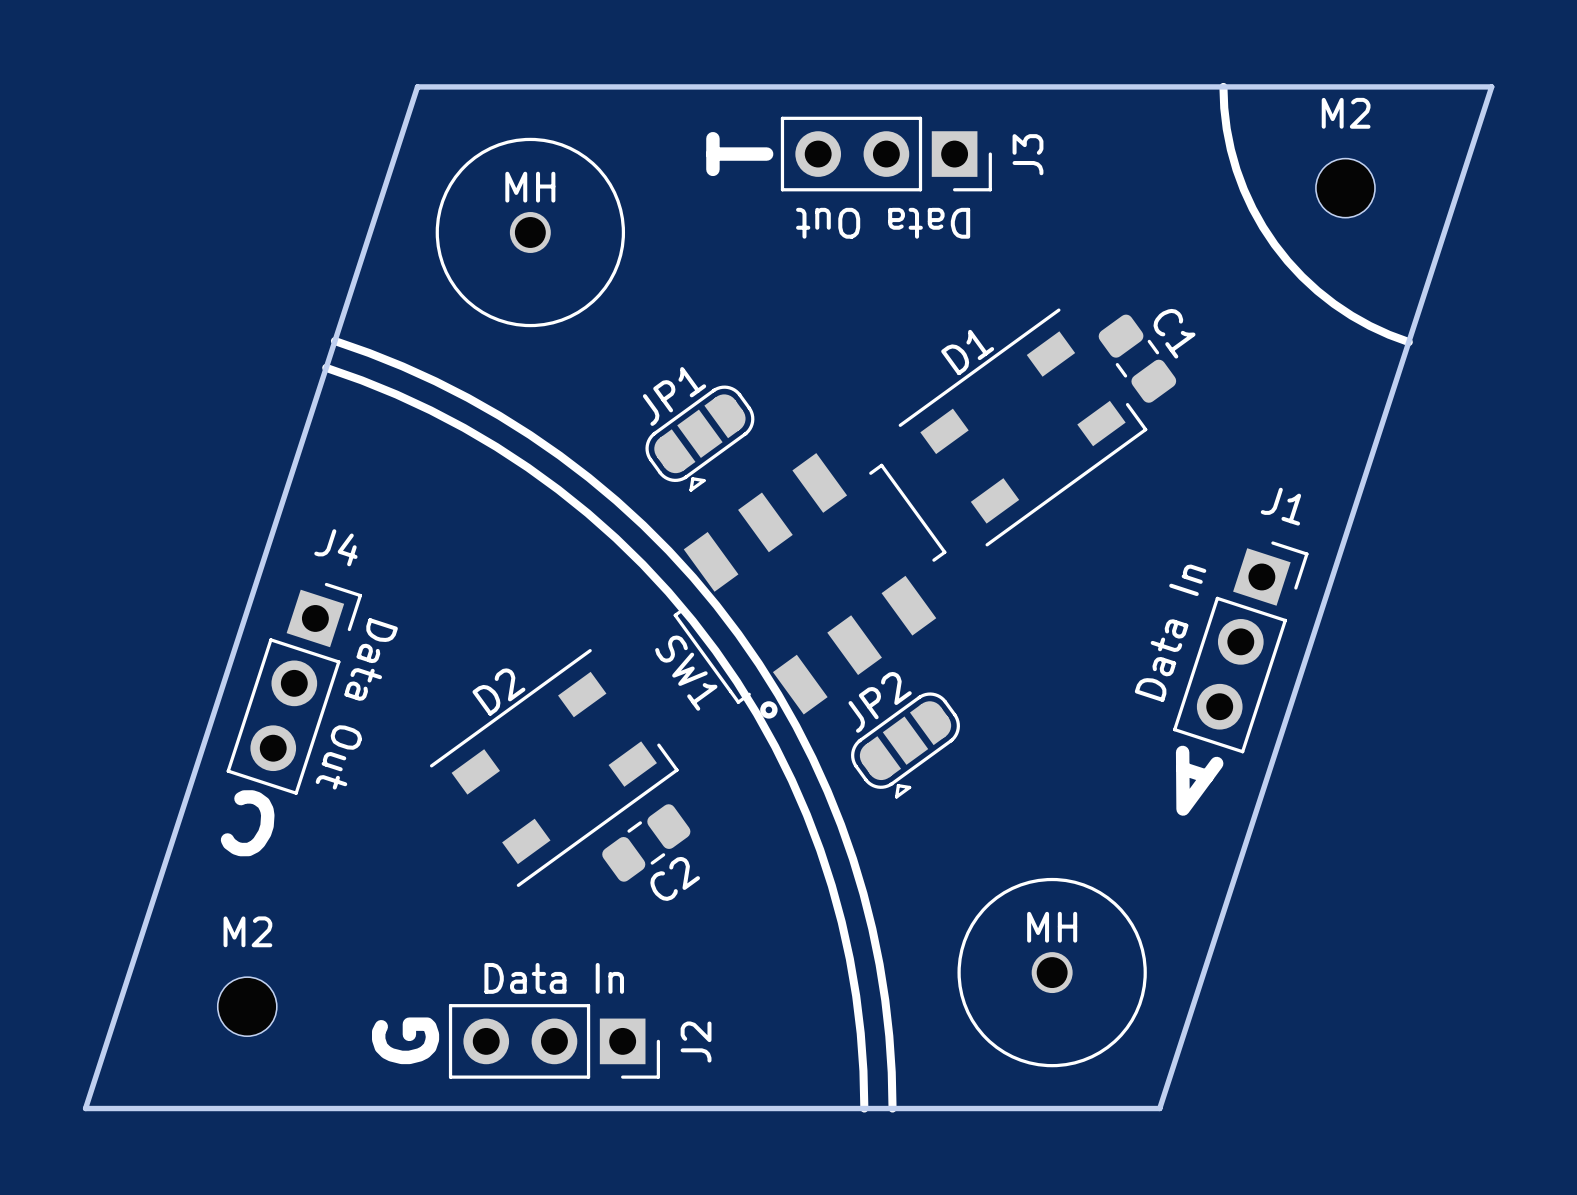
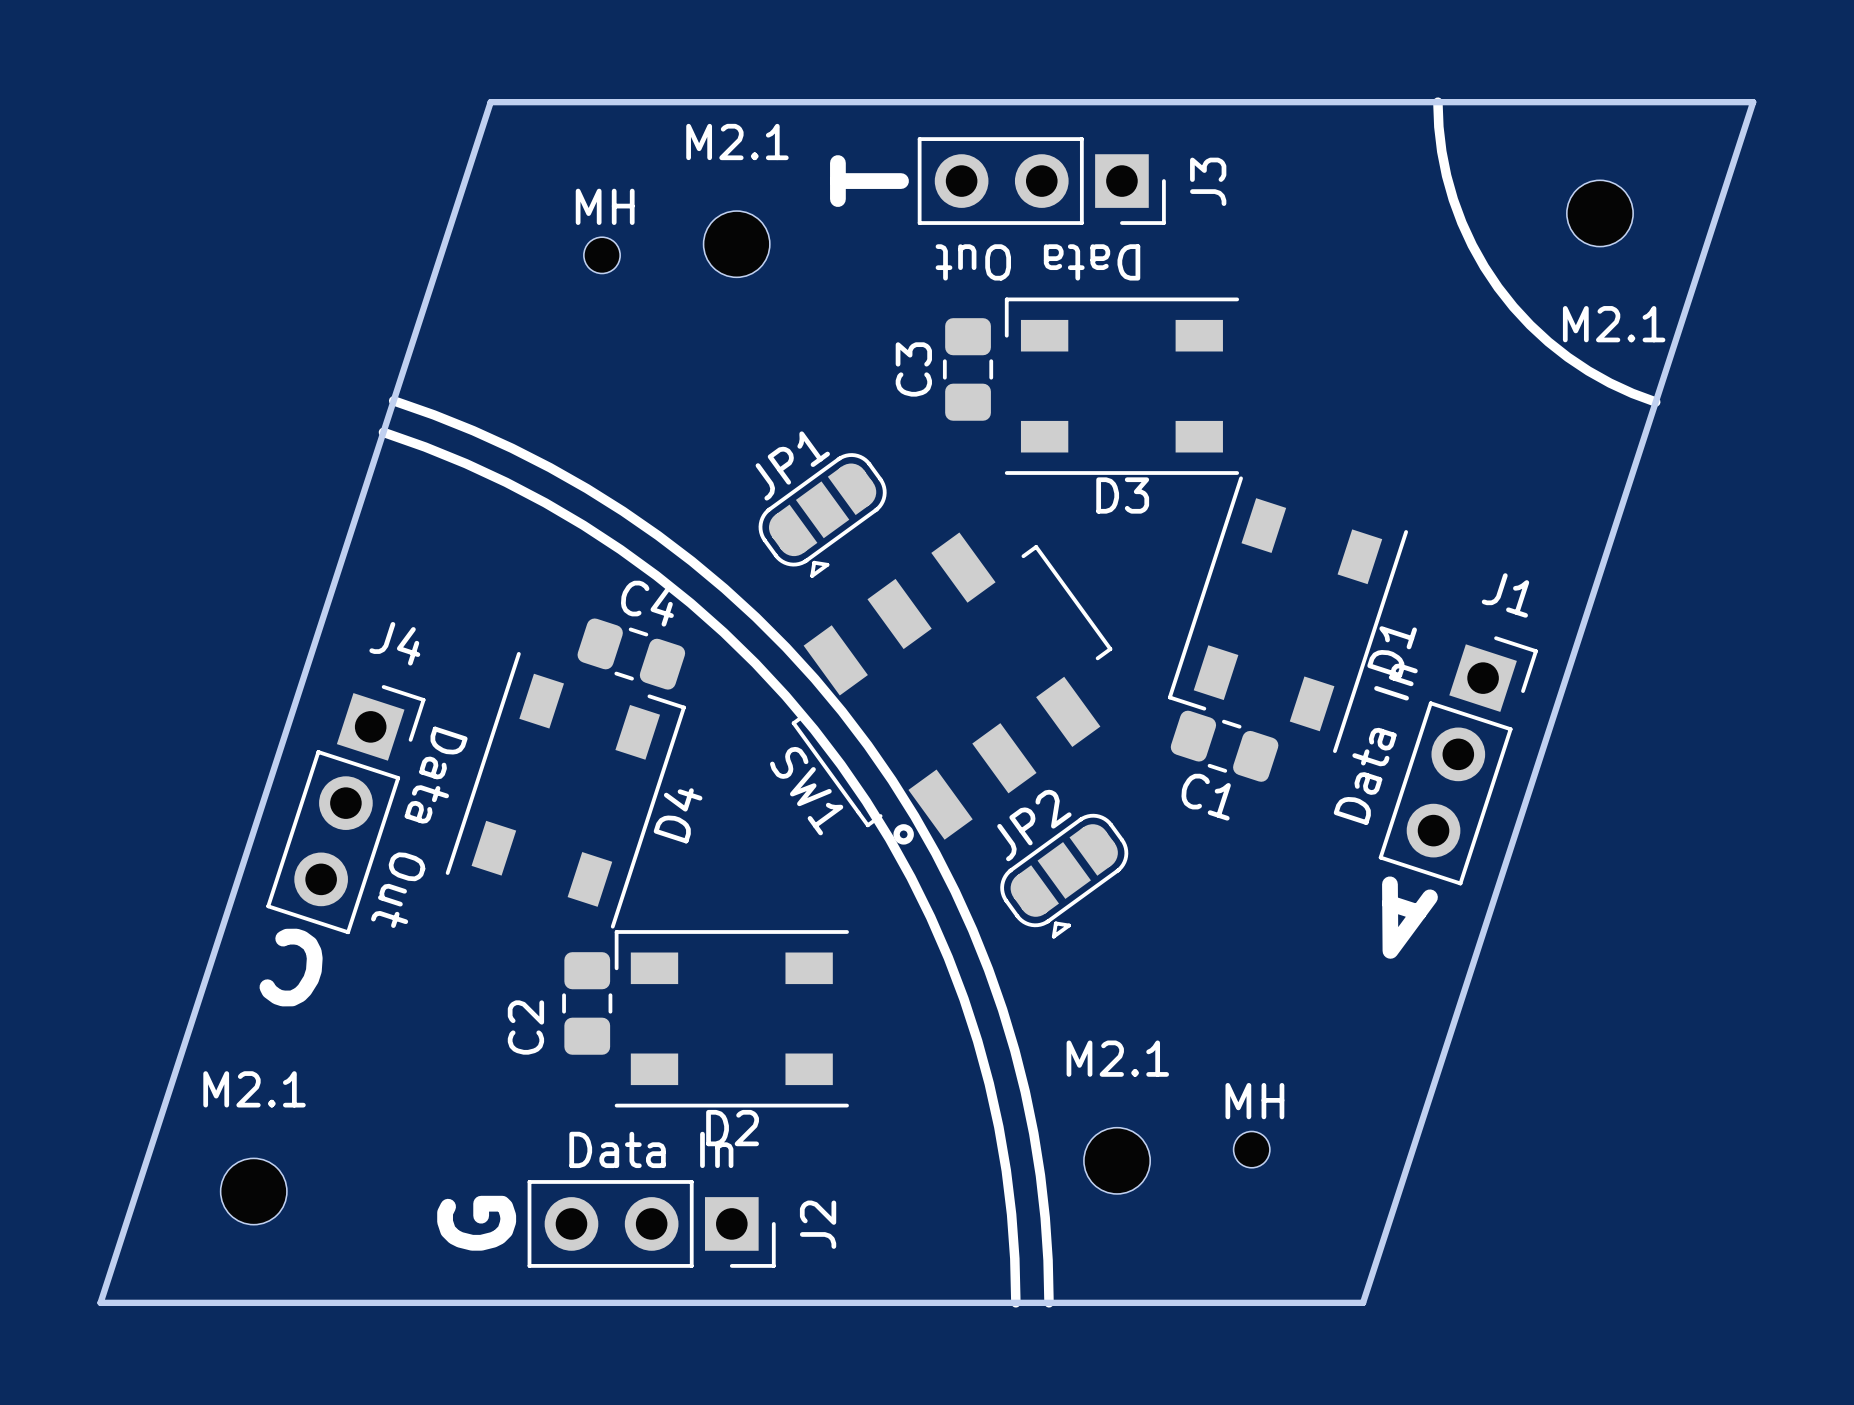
MH footprint: [435, 137, 626, 328] -> [583, 237, 621, 274]
M2.1: none -> (1599, 213)
M2: (1345, 188) -> none
M2.1: none -> (736, 244)
C3: none -> (968, 369)
D3: none -> (1121, 386)
C1 name position: C1 (1174, 333) -> C1 (1206, 797)
C1 rotation: 0° (1137, 358) -> 36° counterclockwise (1224, 746)
C1 position: (1137, 358) -> (1224, 746)
D1 rotation: 0° (1022, 427) -> 144° clockwise (1287, 614)
C4: none -> (631, 654)
D4: none -> (565, 790)
D2 rotation: 0° (554, 767) -> 144° counterclockwise (731, 1018)
C2 rotation: 0° (646, 842) -> 54° counterclockwise (587, 1003)
C2 position: (646, 842) -> (587, 1003)
MH footprint: [957, 877, 1147, 1068] -> [1233, 1131, 1270, 1168]
C2 name position: C2 (675, 878) -> C2 (525, 1027)
M2.1: none -> (1117, 1160)
M2: (247, 1006) -> none
M2.1: none -> (253, 1191)

